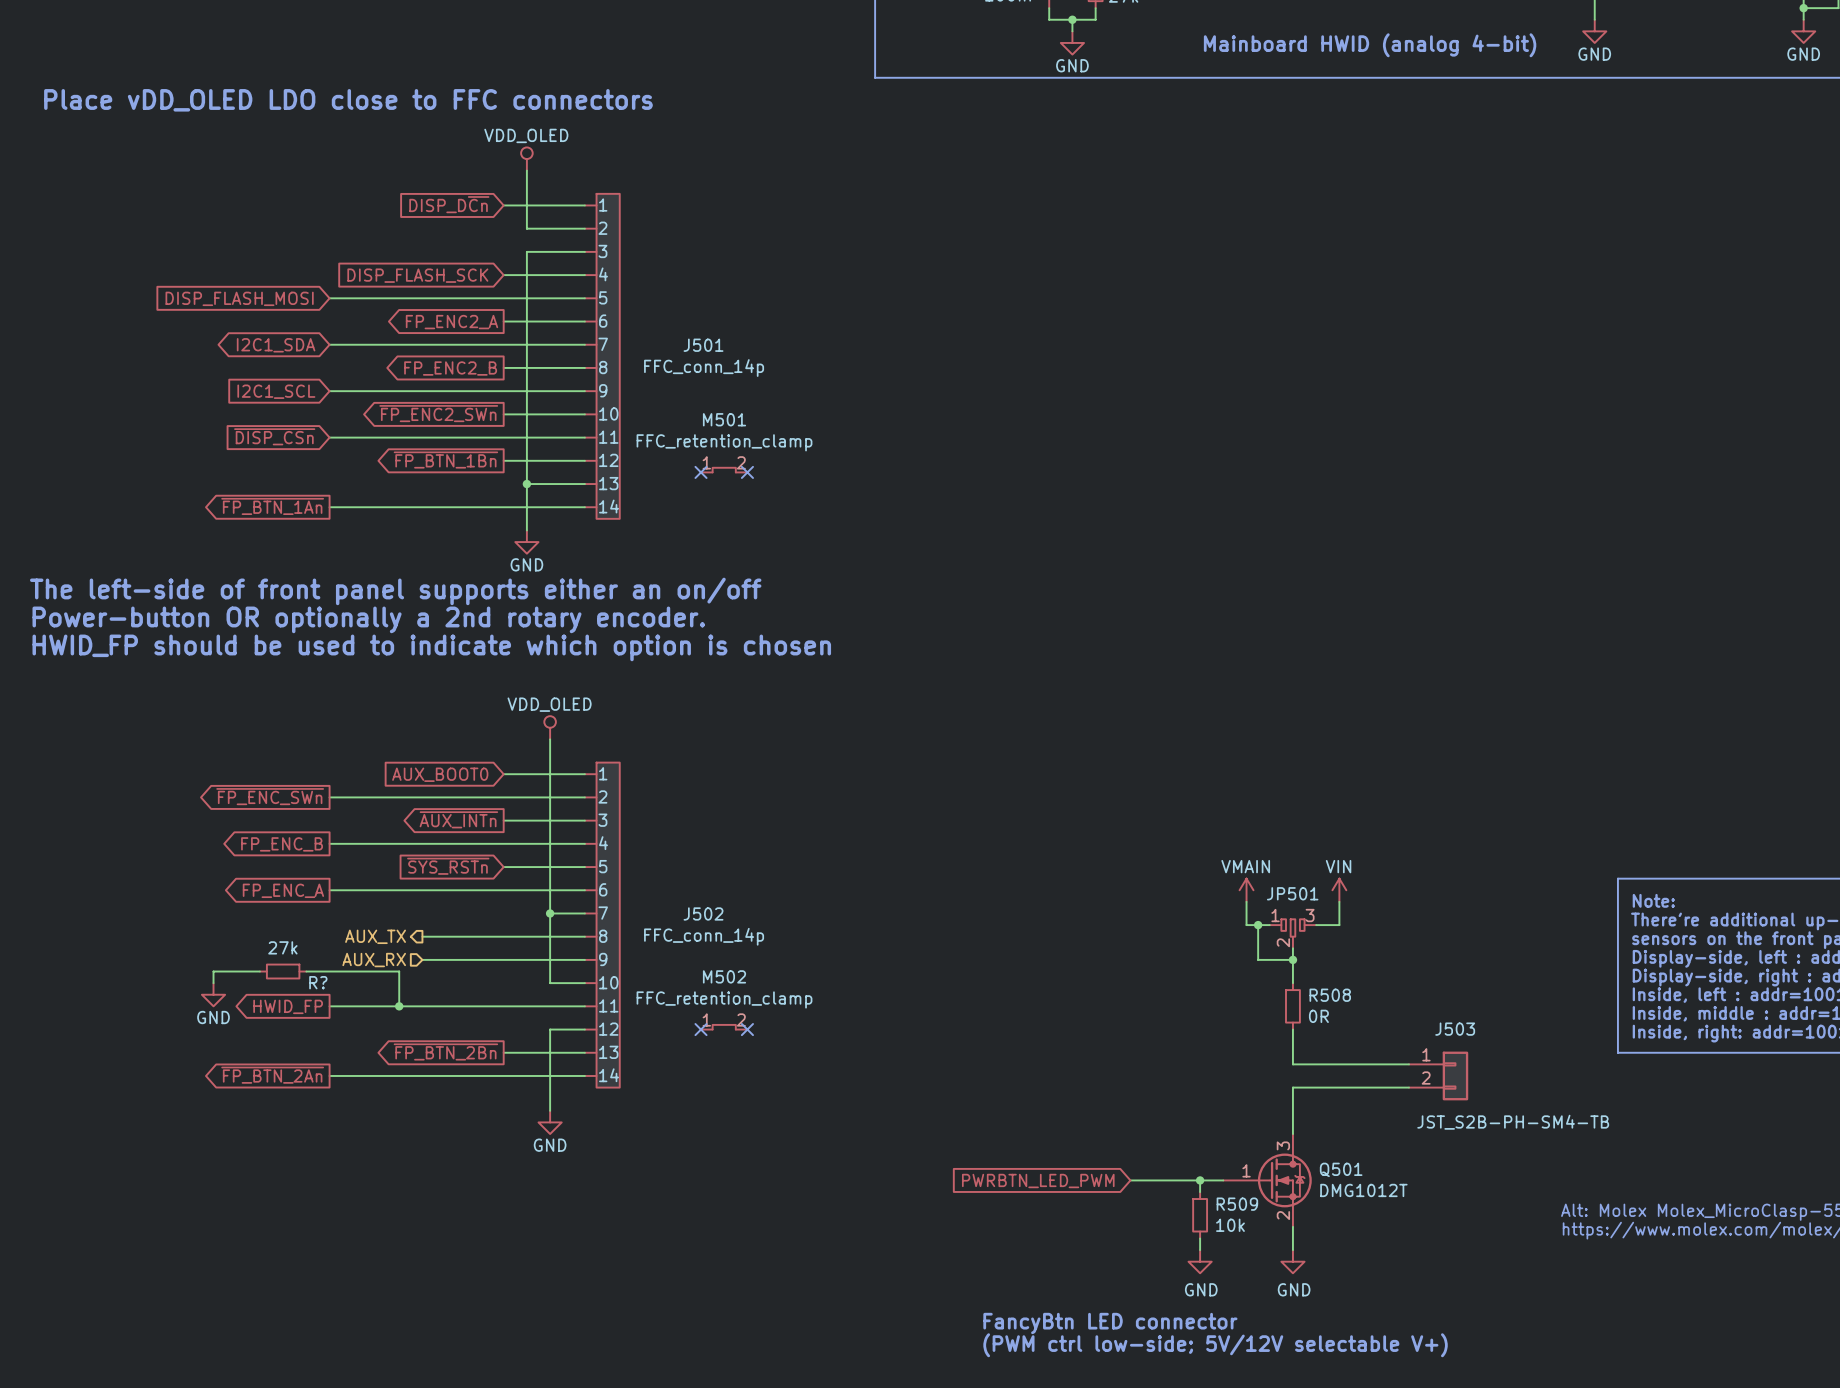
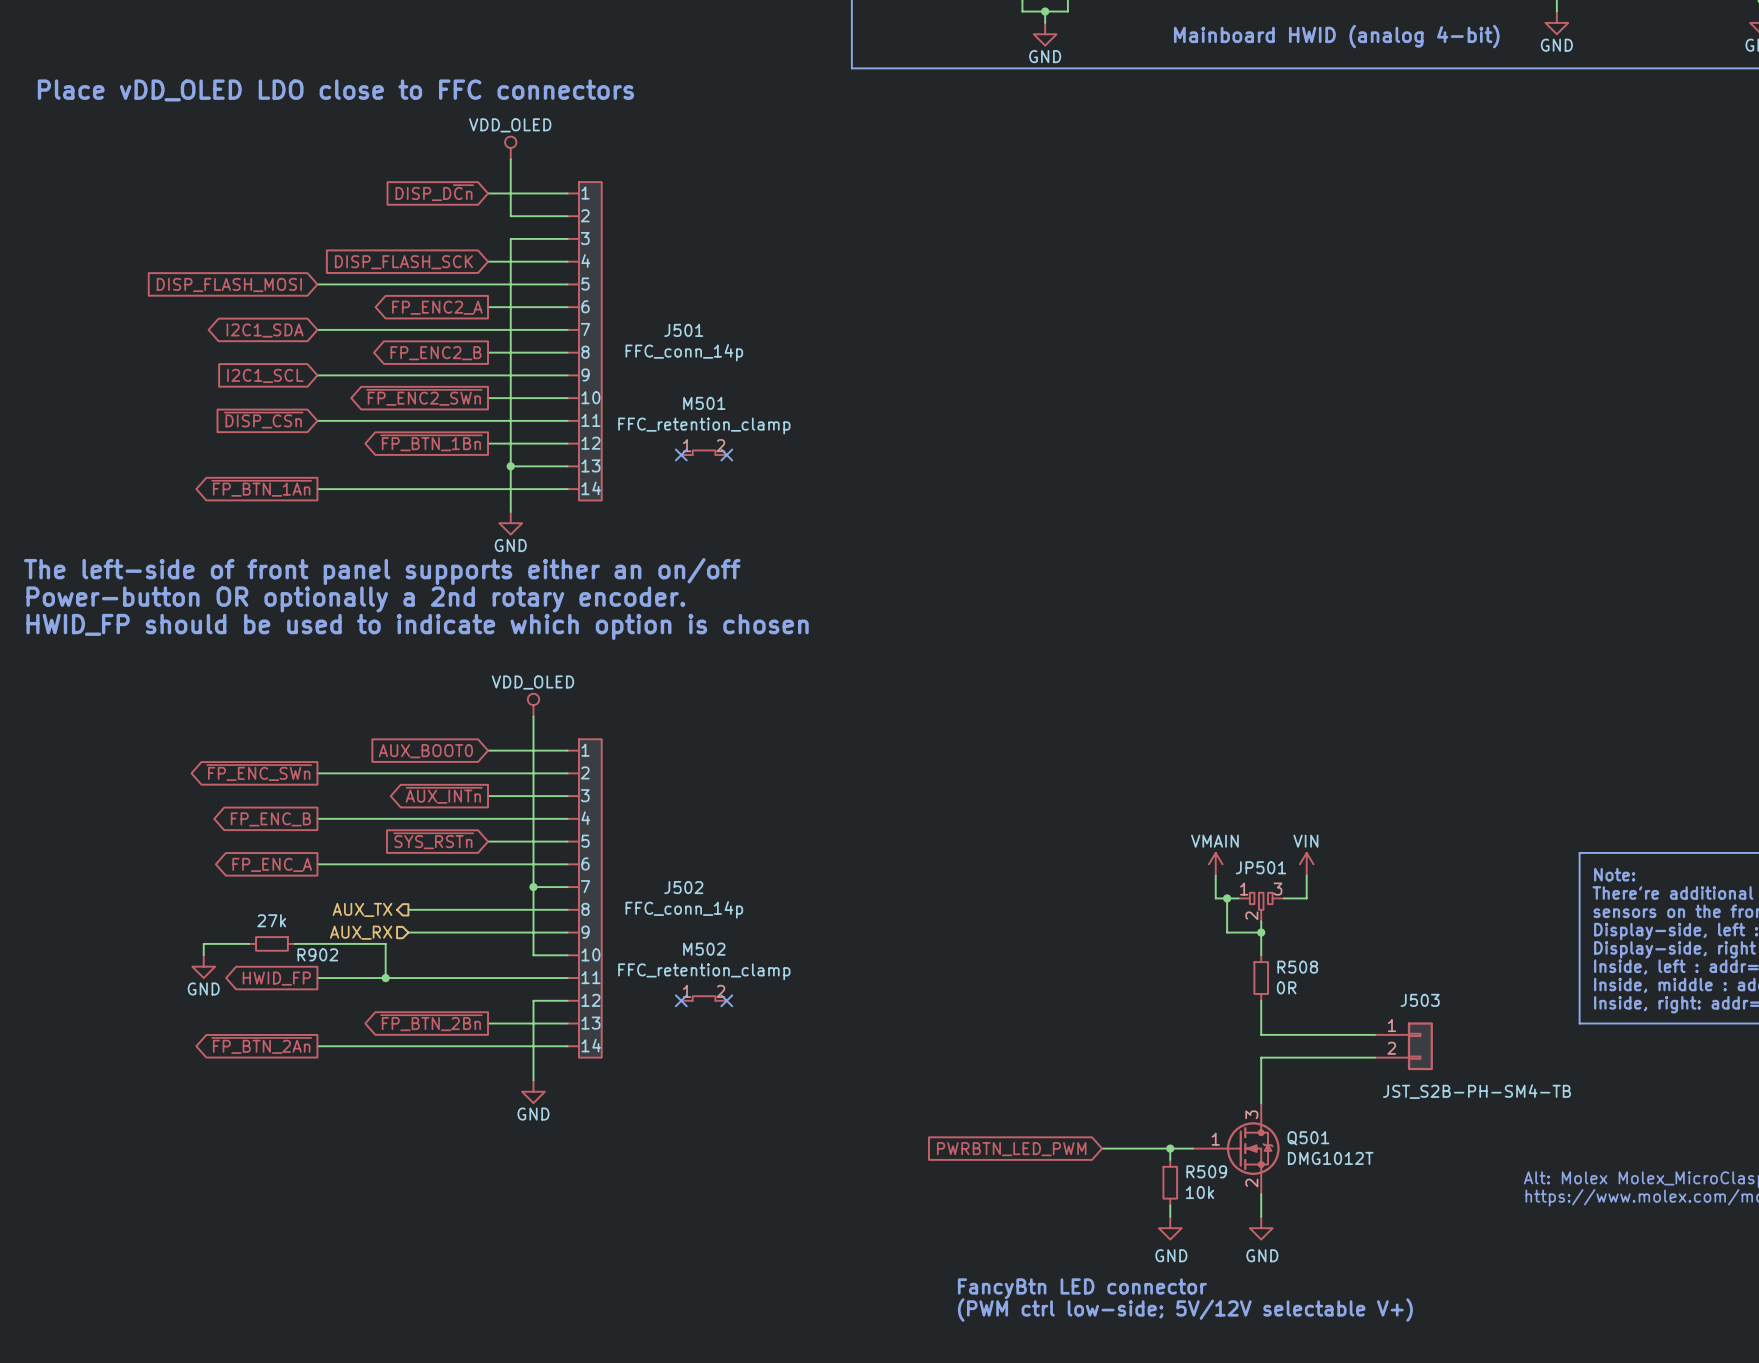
R? name: R? (318, 982) -> R902 (317, 954)

